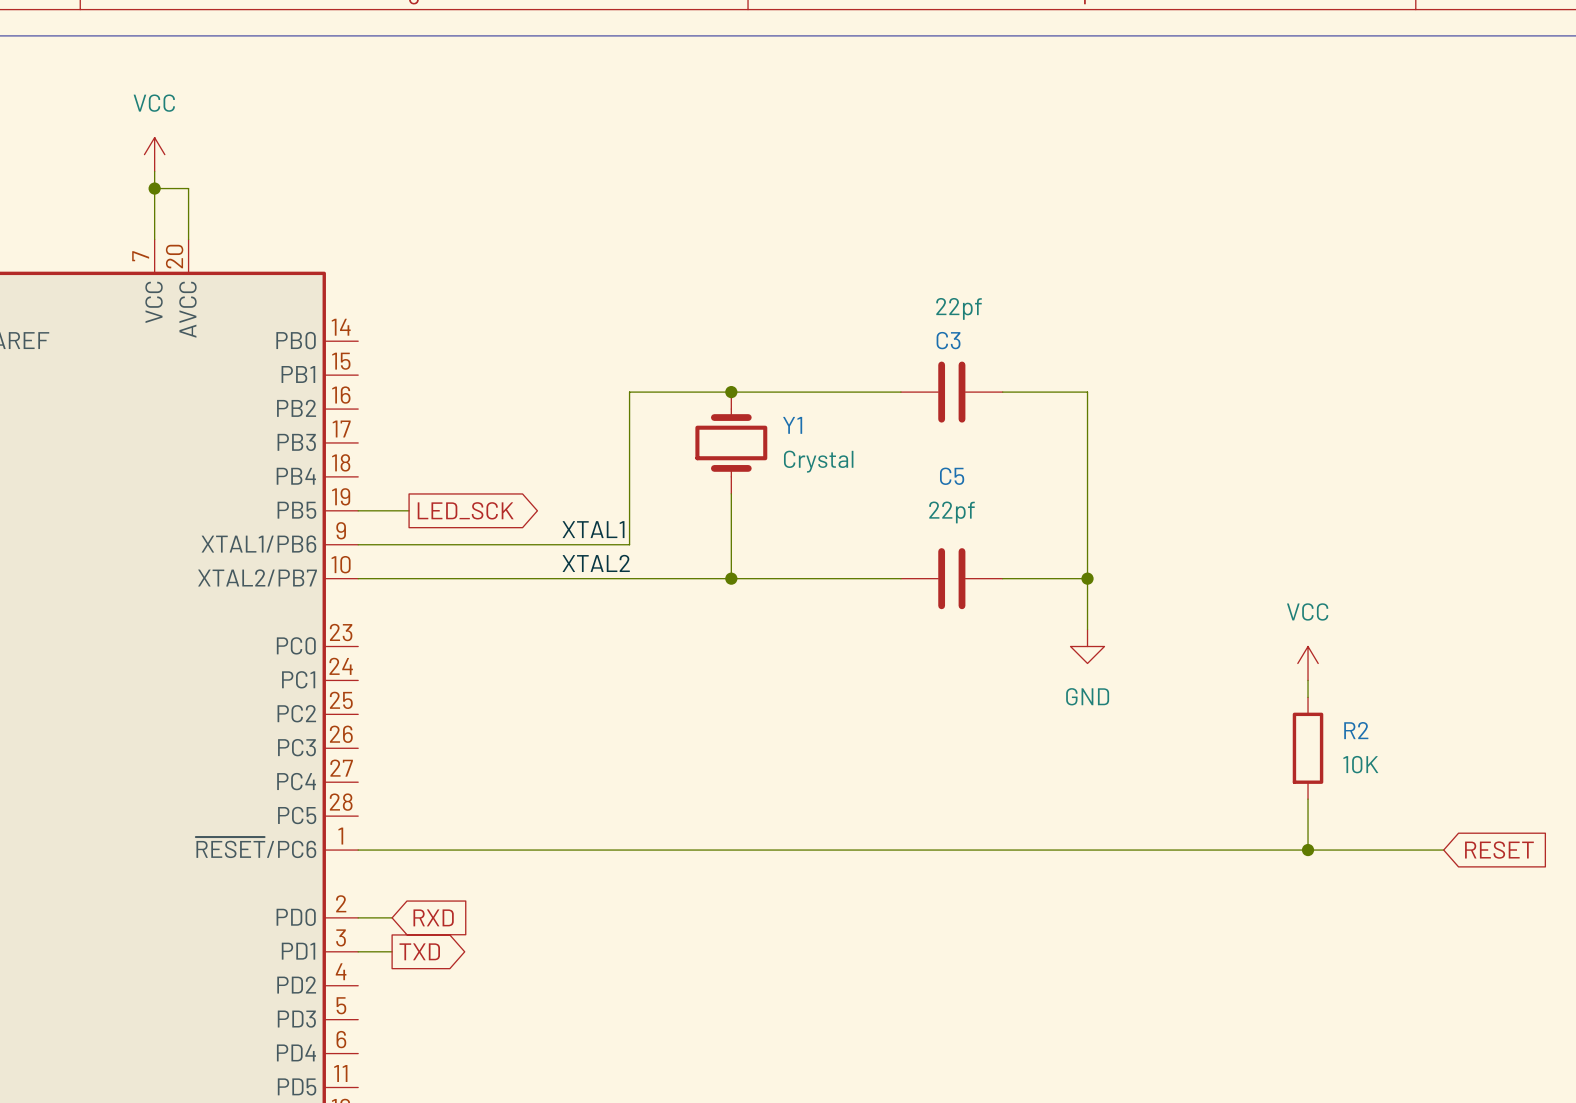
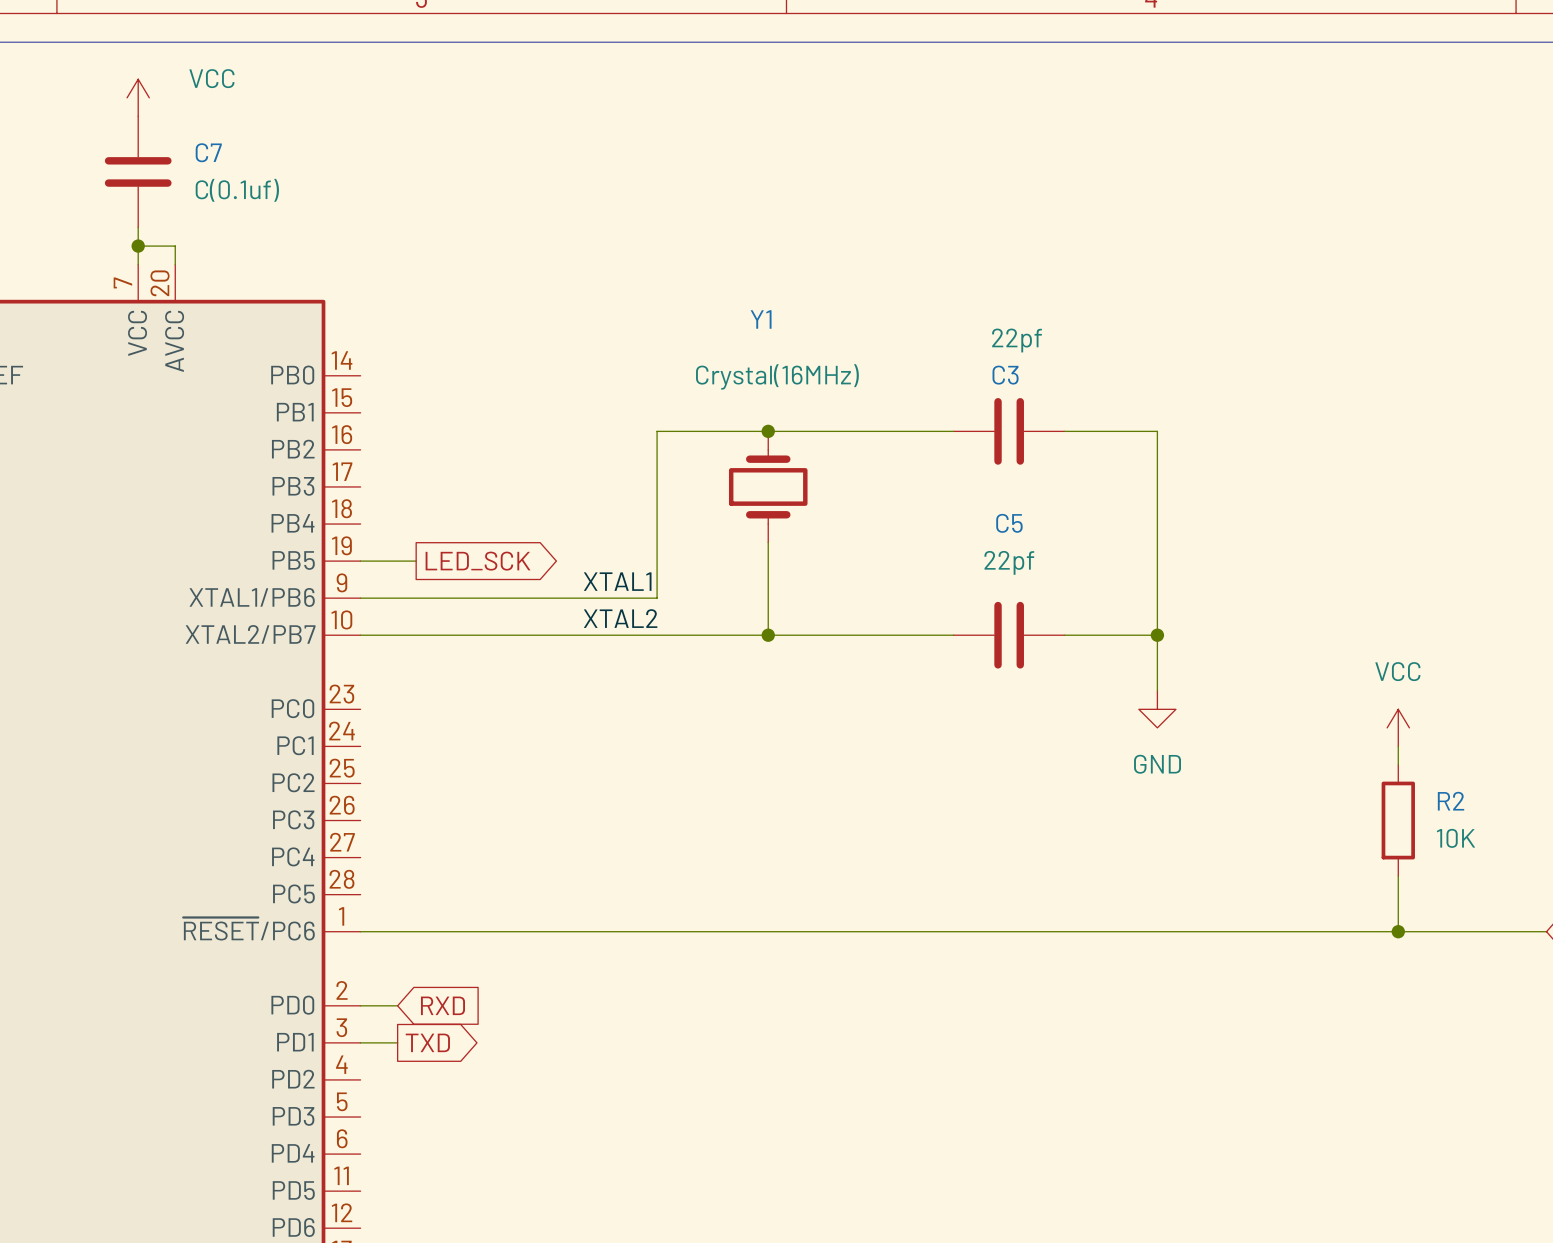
power symbol text position: VCC (154, 103) -> VCC (211, 78)
C7: none -> C(0.1uf) (138, 171)
power symbol position: VCC (154, 154) -> VCC (138, 97)
wire: (154, 188) (188, 188) (188, 222) -> (138, 246) (175, 246)
junction position: (154, 188) -> (138, 246)
Y1 name position: Y1 (792, 425) -> Y1 (761, 319)
Y1 value: Crystal (818, 461) -> Crystal(16MHz) (777, 376)

